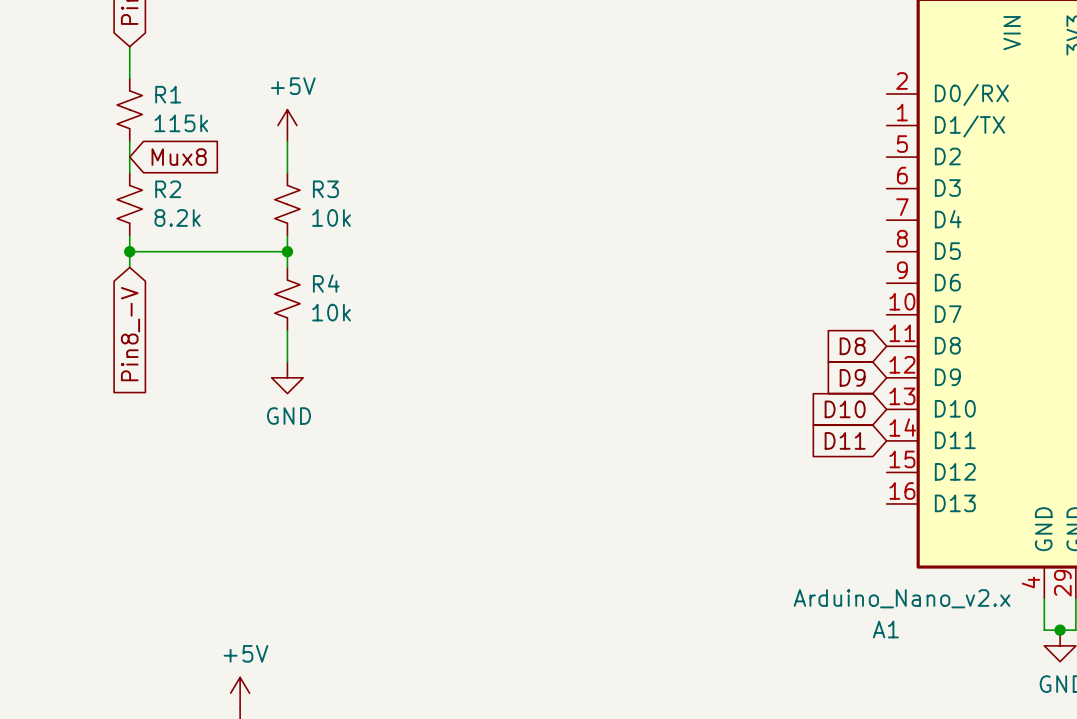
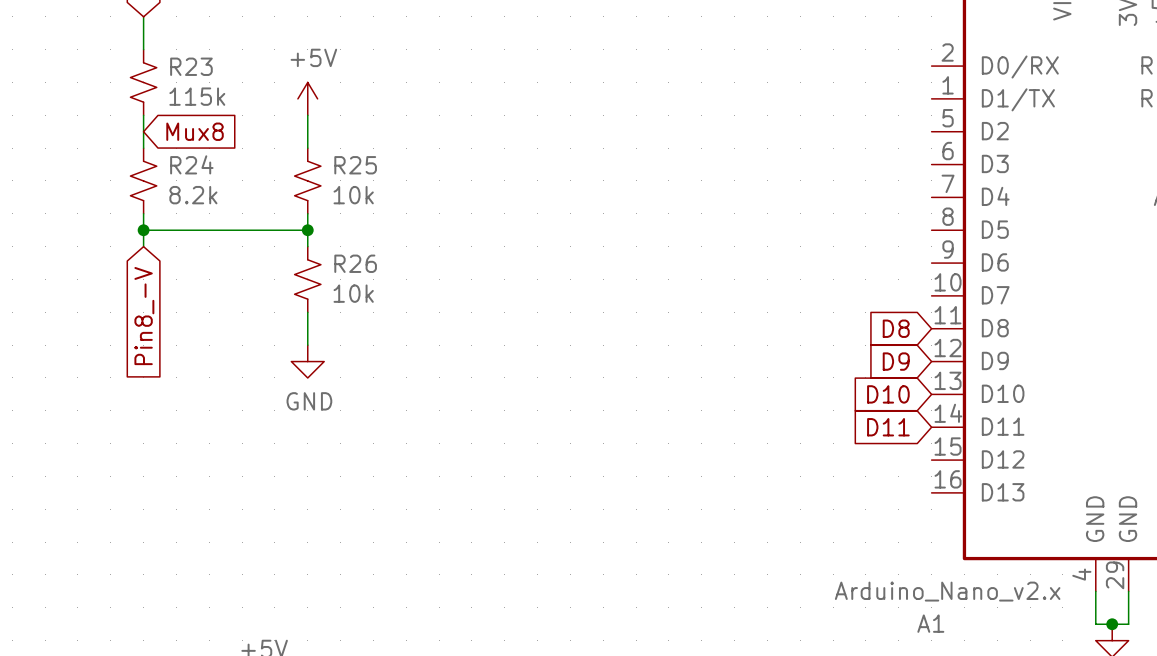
R1 name: R1 (168, 94) -> R23 (191, 66)
R2 name: R2 (168, 189) -> R24 (191, 164)
R3 name: R3 (325, 189) -> R25 (355, 165)
R4 name: R4 (326, 283) -> R26 (355, 263)

